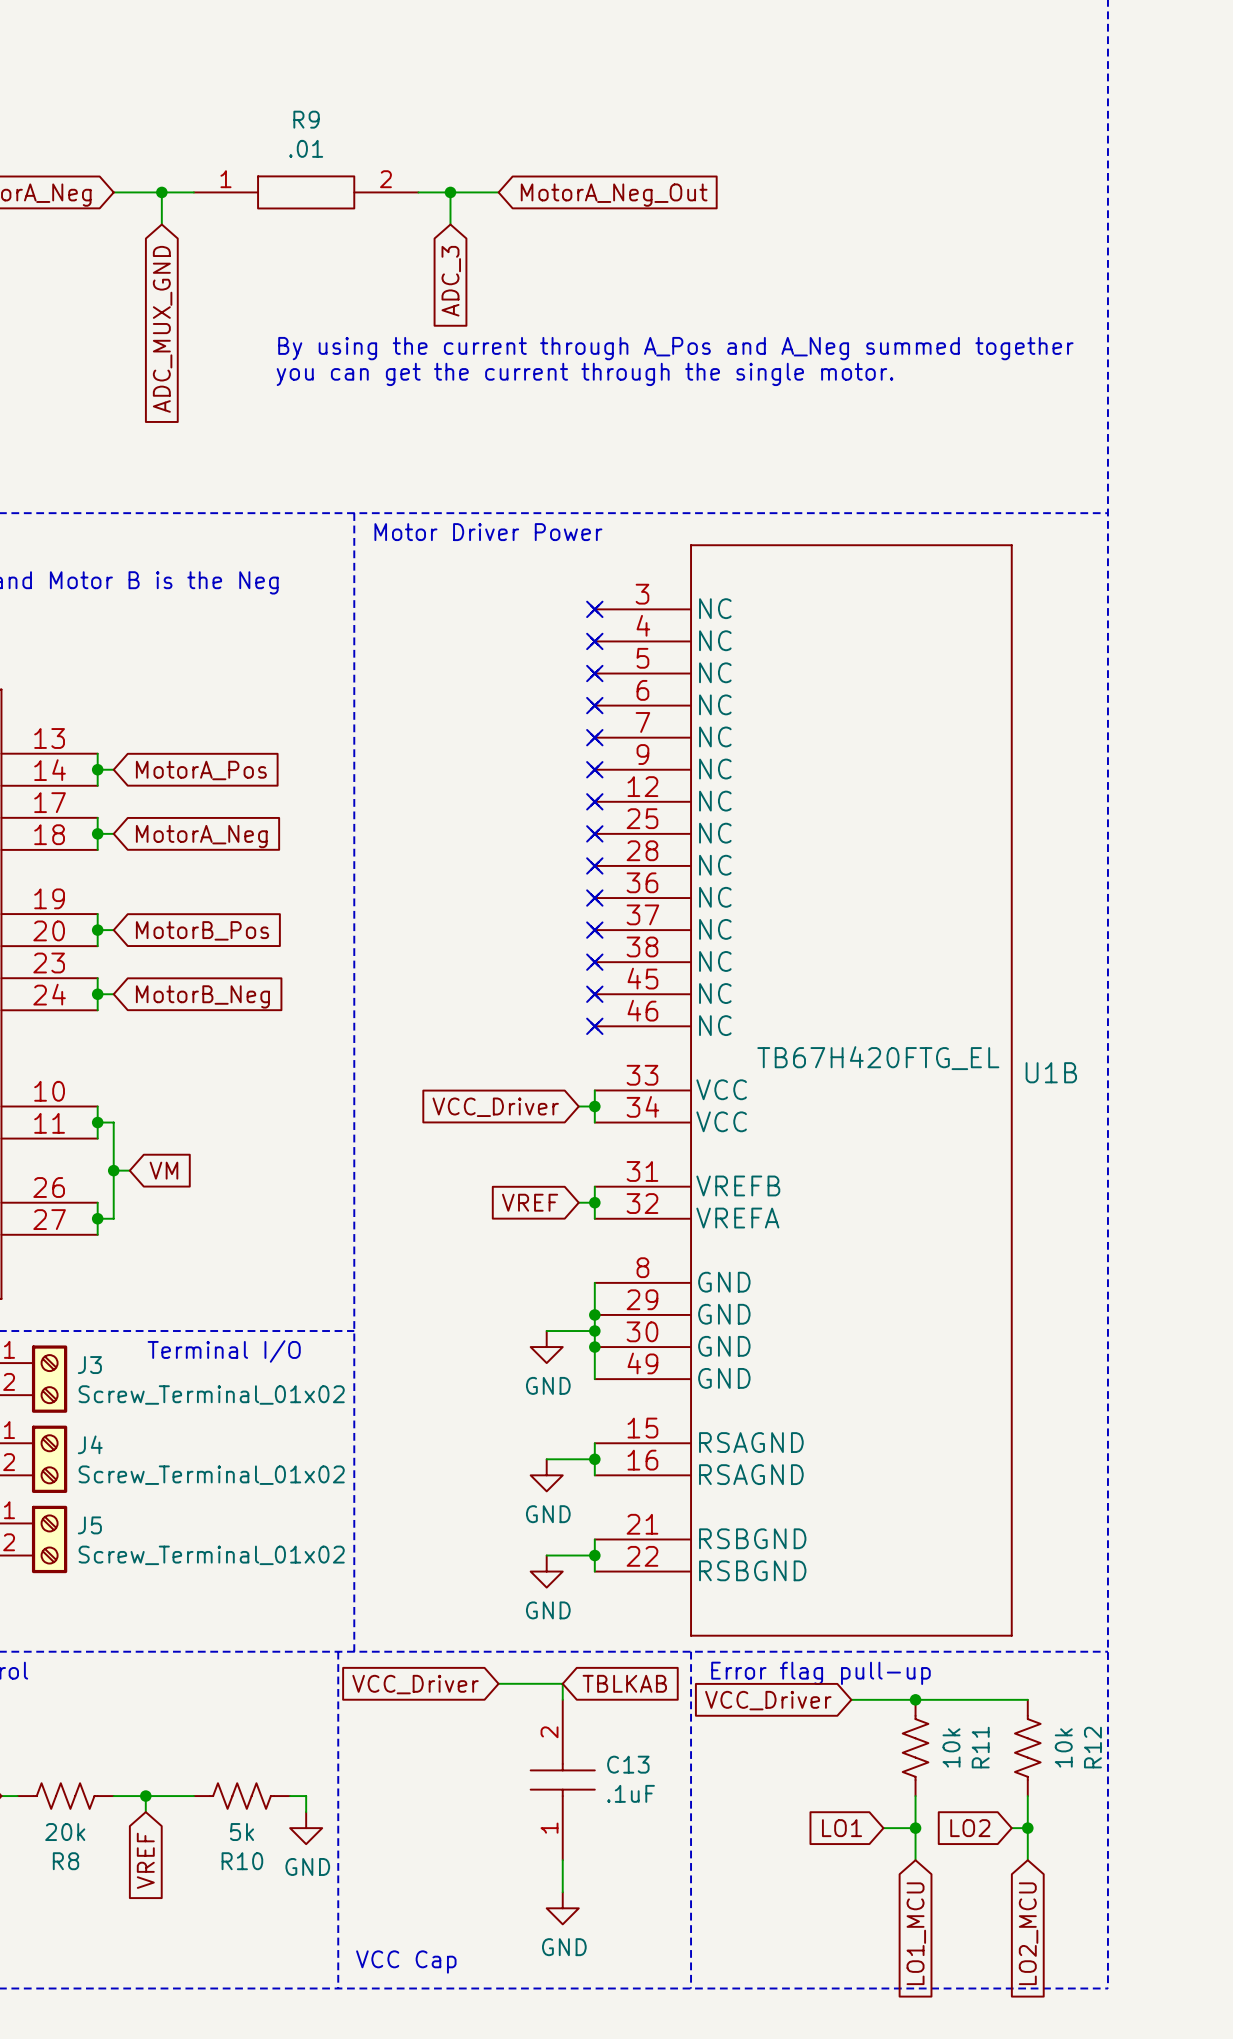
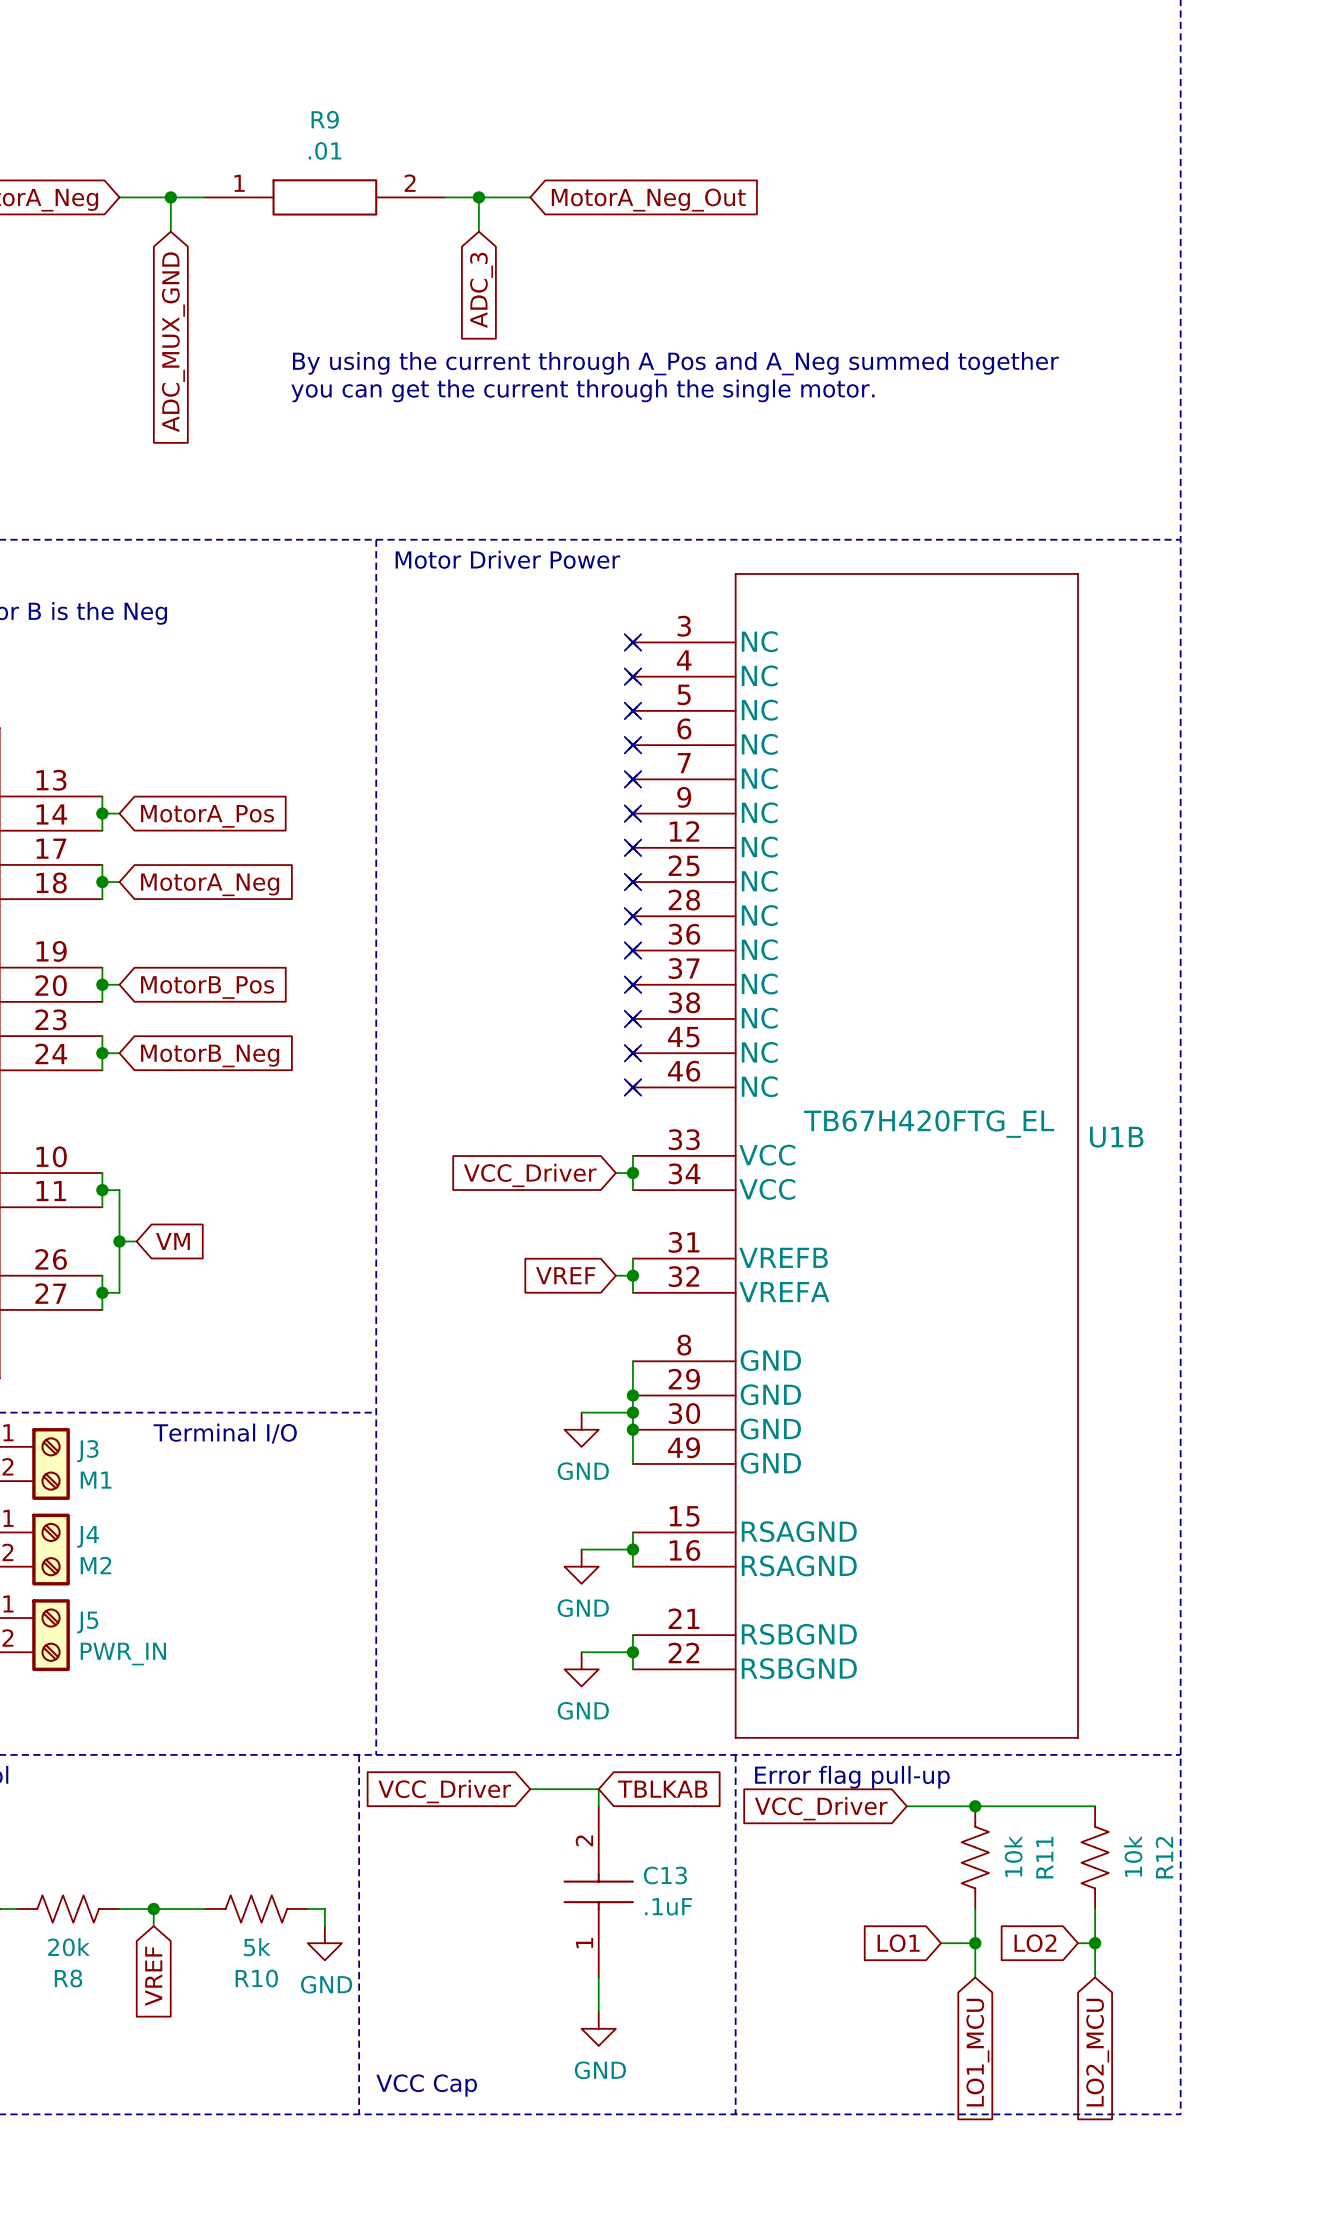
J3 value: Screw_Terminal_01x02 (211, 1394) -> M1 (96, 1480)
J4 value: Screw_Terminal_01x02 (211, 1475) -> M2 (95, 1565)
J5 value: Screw_Terminal_01x02 (211, 1555) -> PWR_IN (123, 1654)

